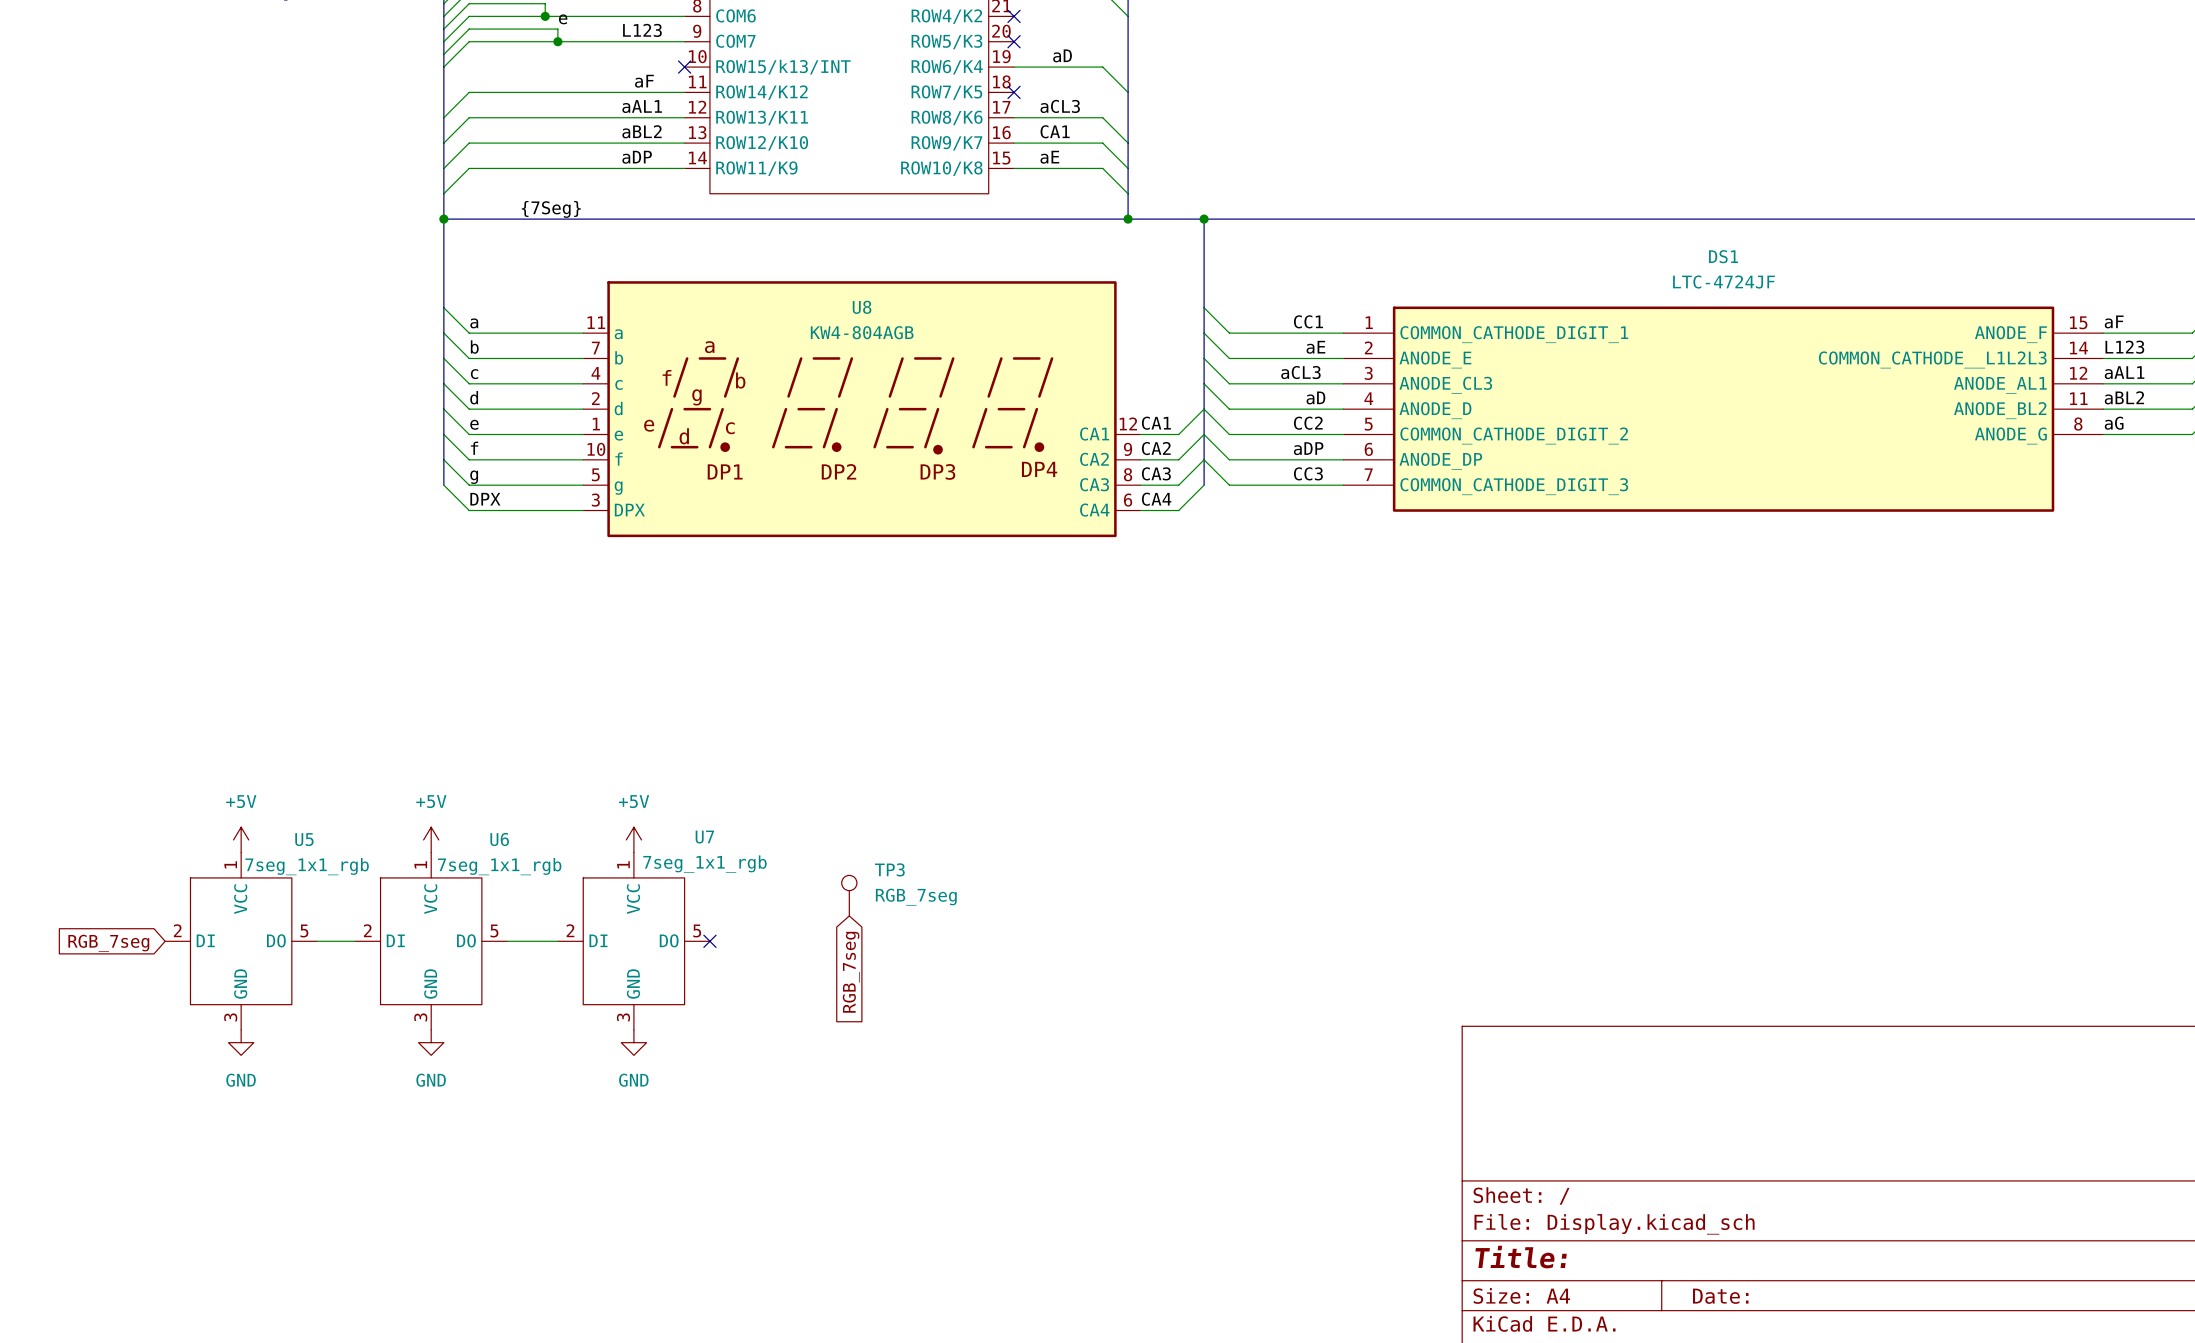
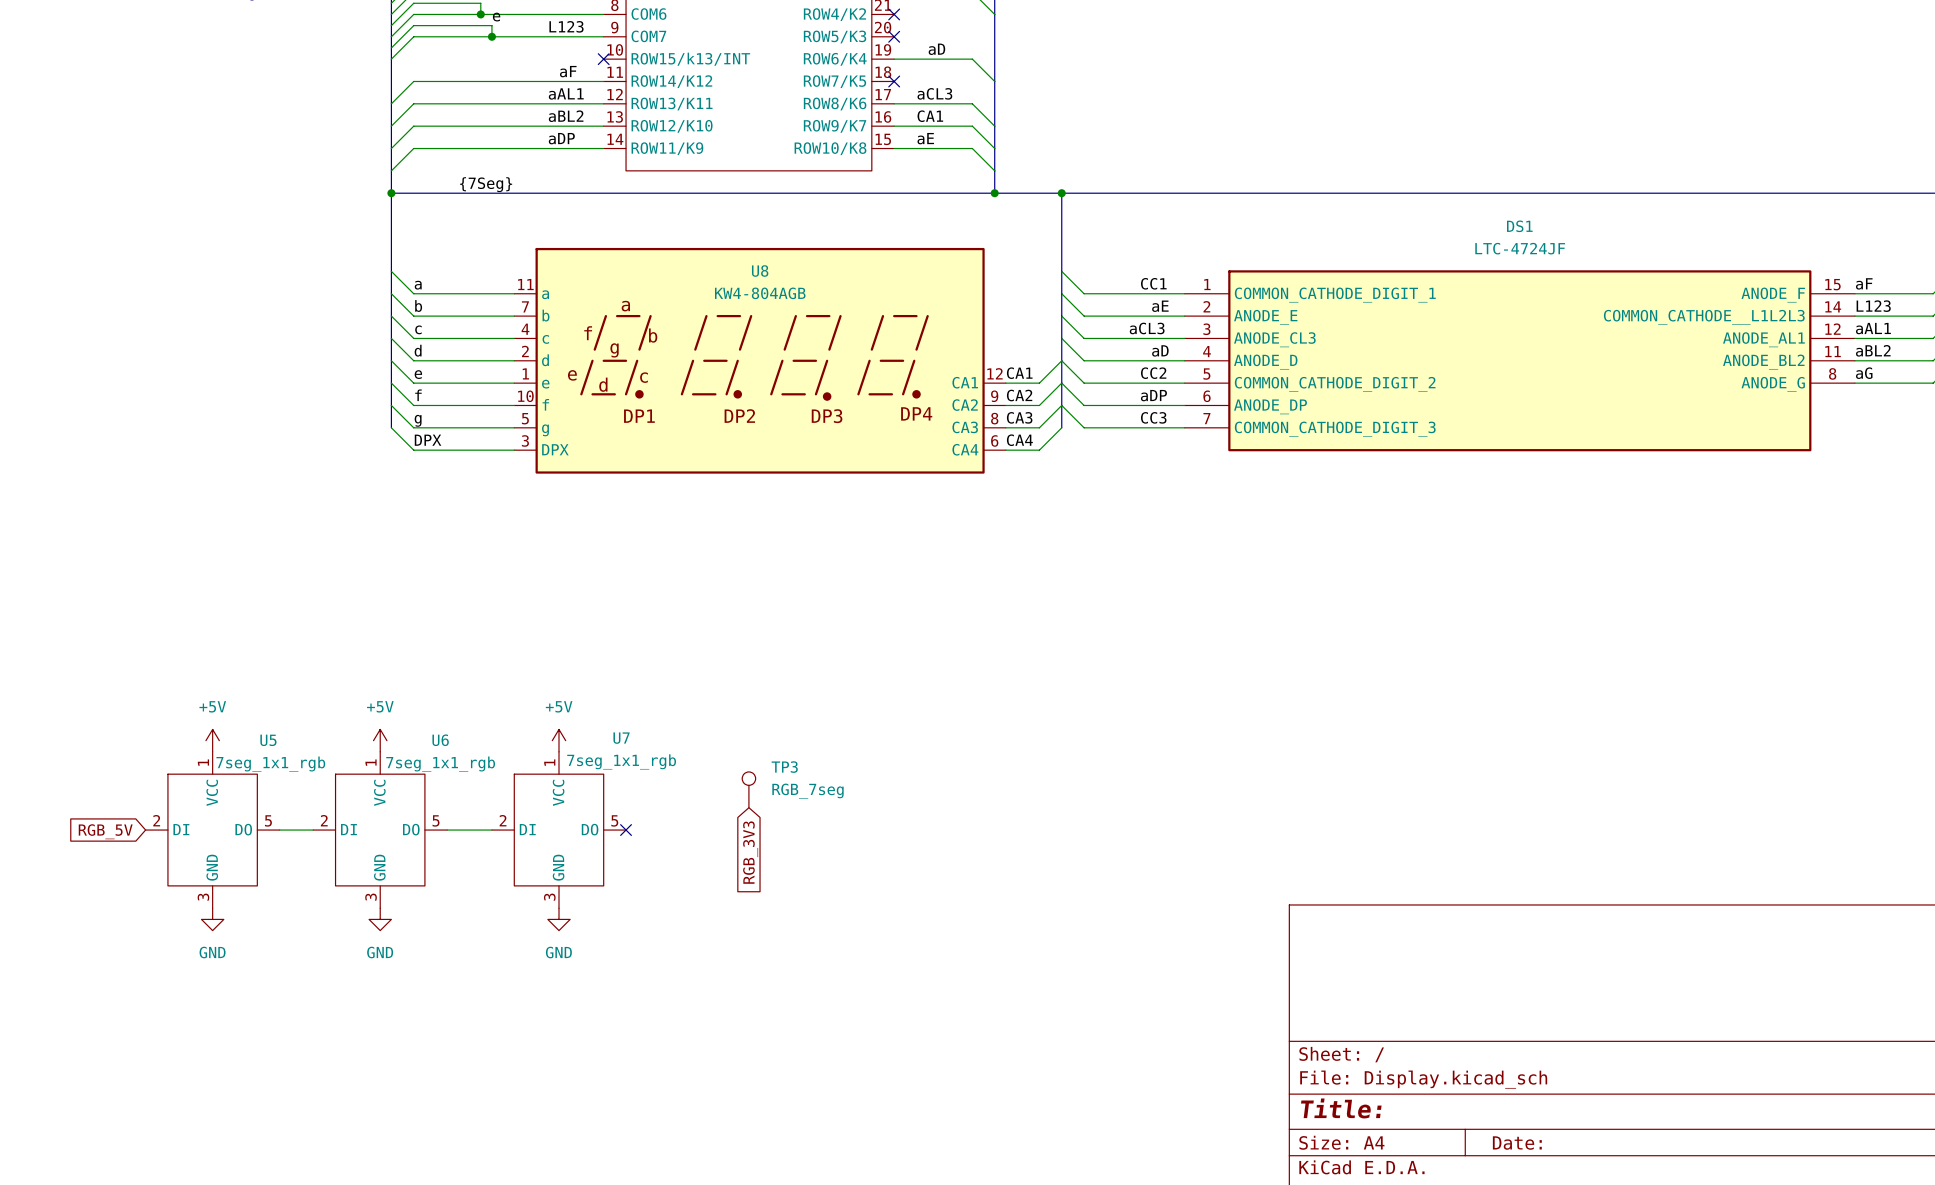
global label: RGB_7seg (108, 943) -> RGB_5V (105, 831)
global label: RGB_7seg (851, 972) -> RGB_3V3 (750, 852)

